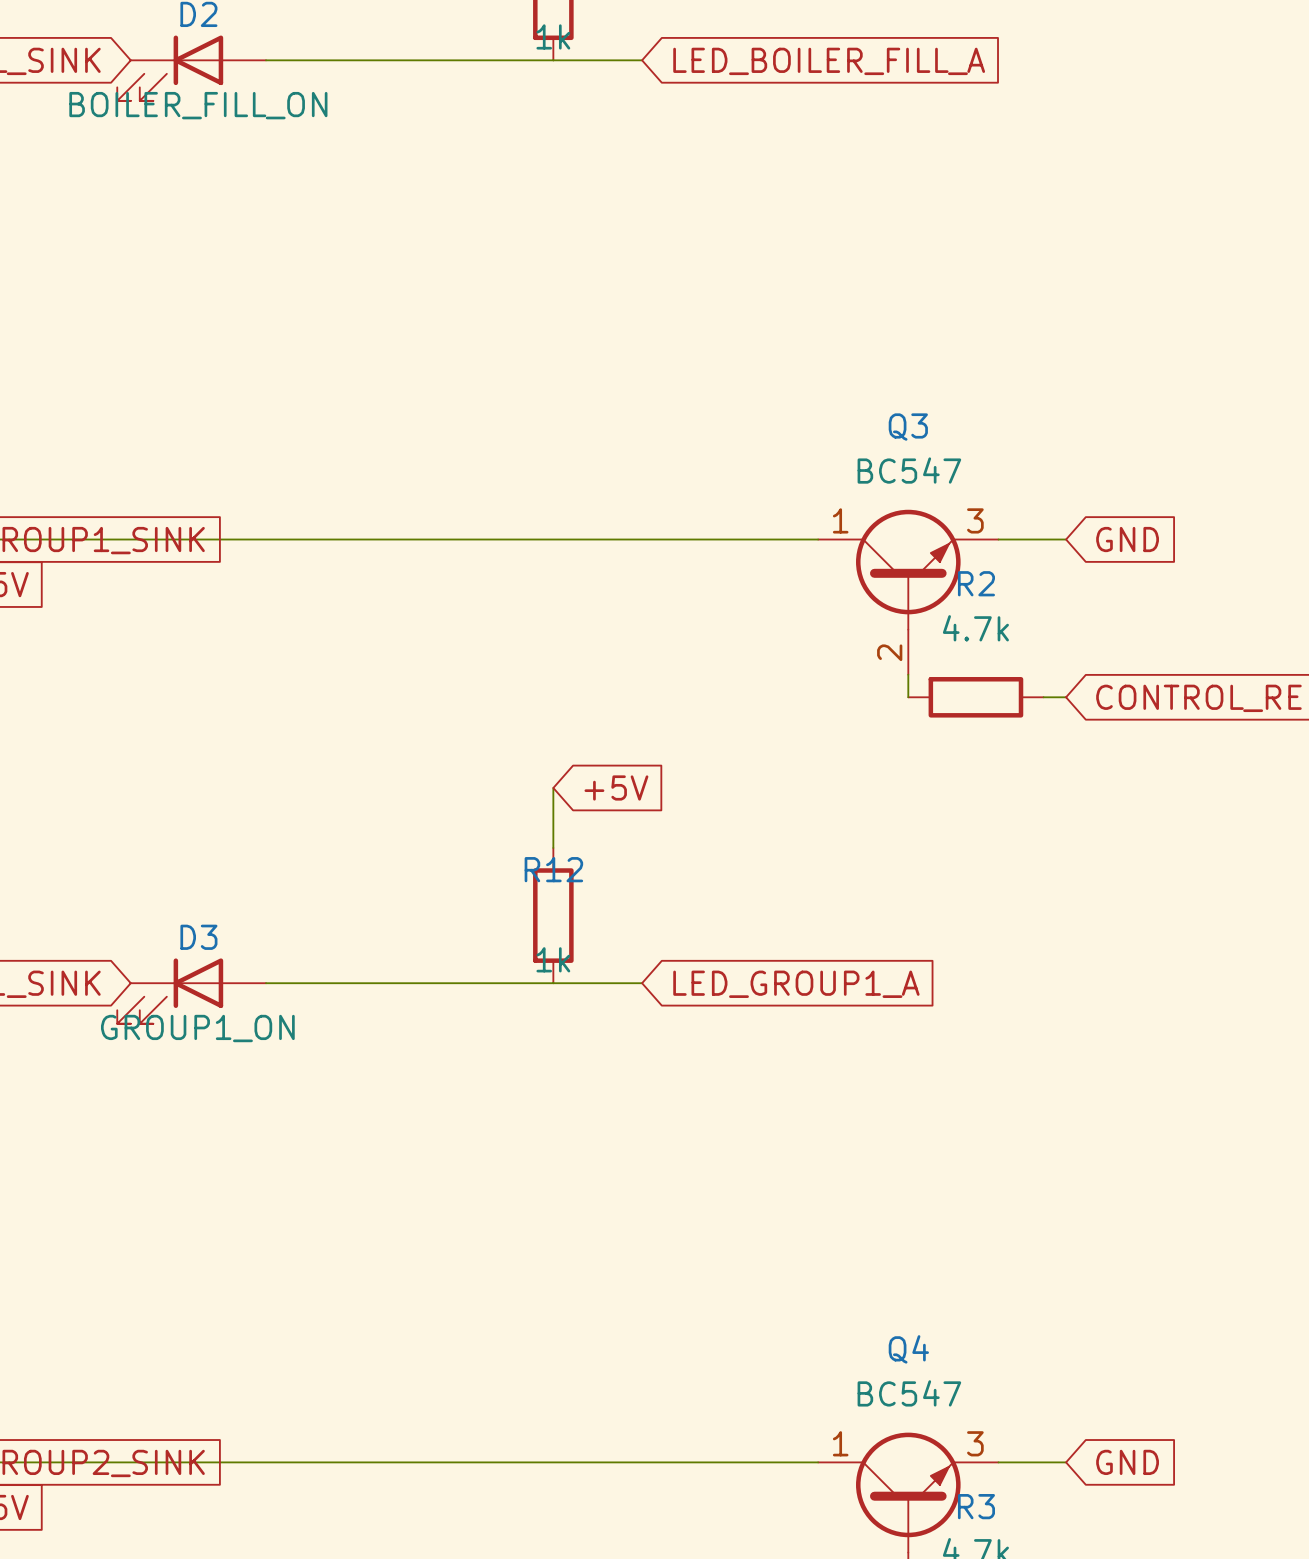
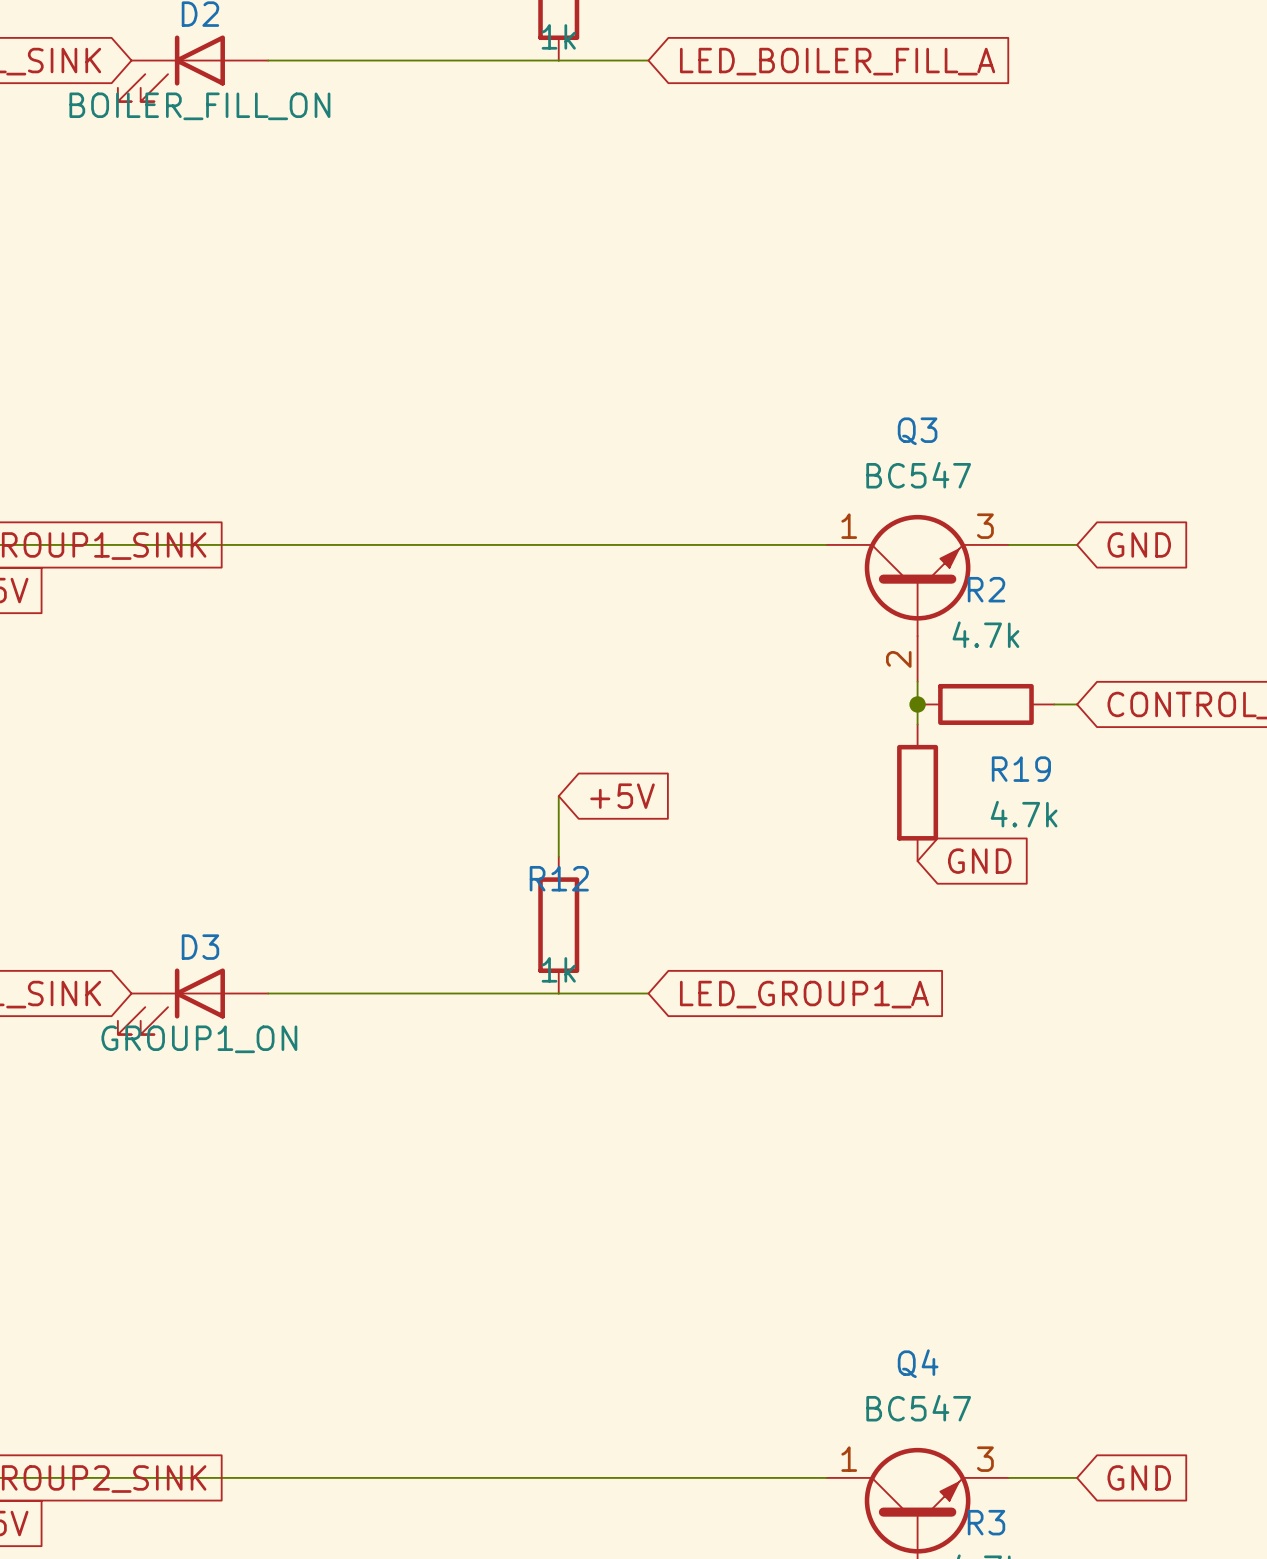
wire: none -> (917, 704) (917, 724)
junction: none -> (917, 704)
R19: none -> 4.7k (917, 792)
global label: none -> GND (979, 861)

